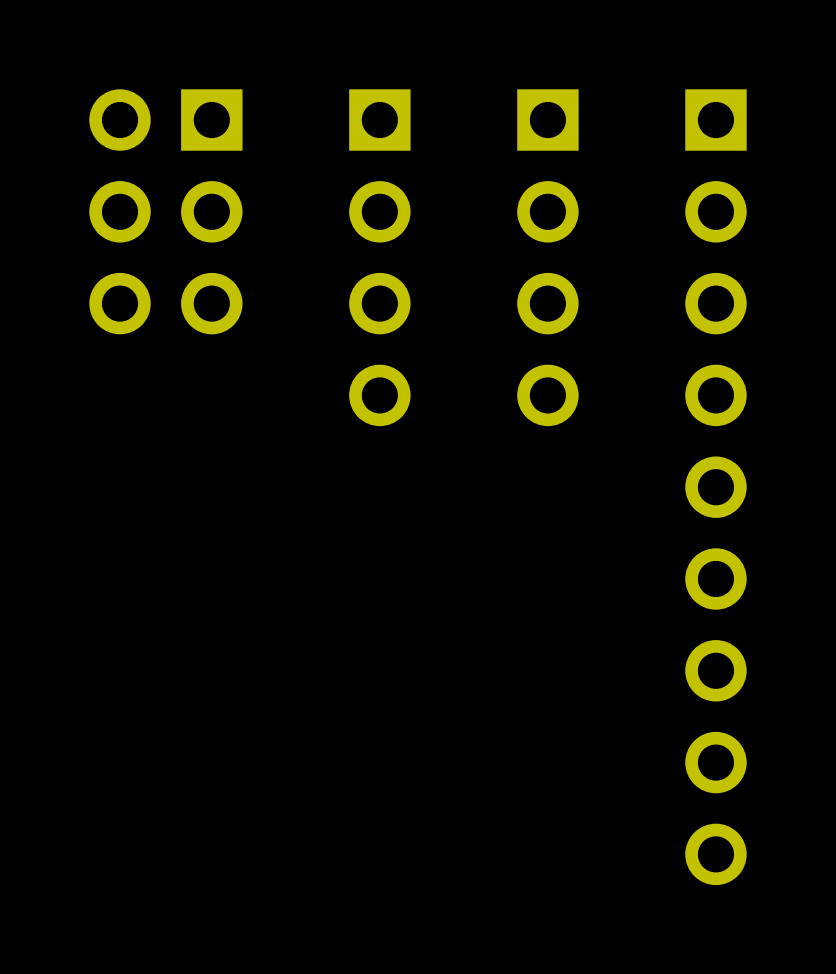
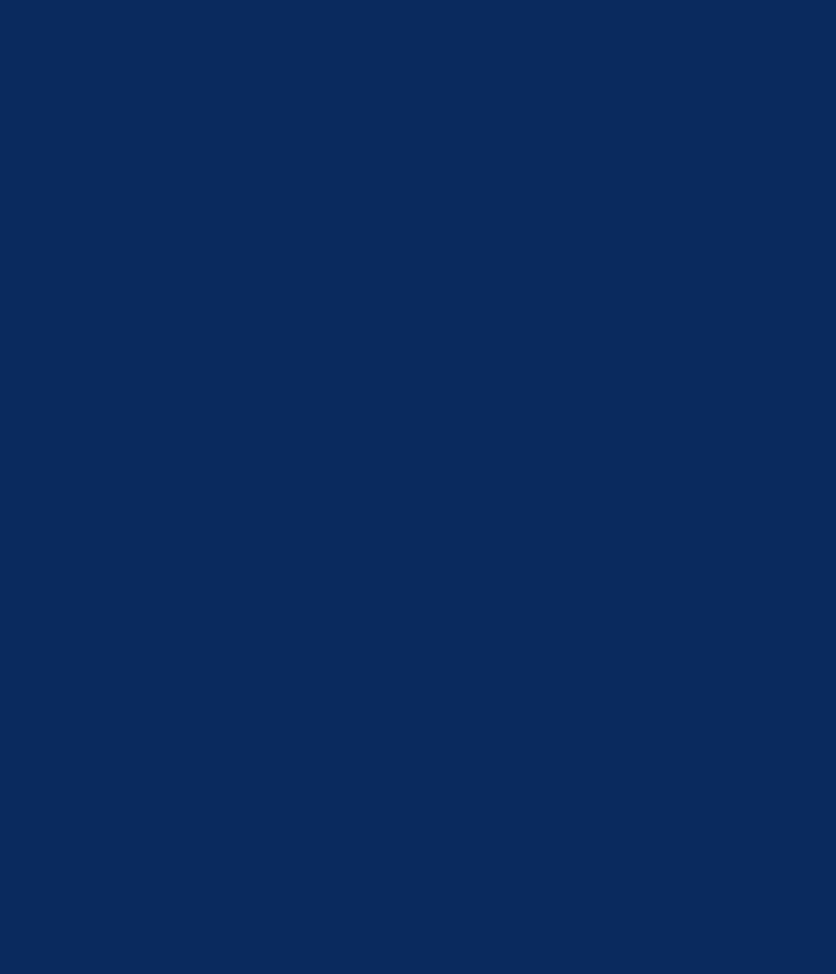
part: (165, 211) -> none
part: (379, 257) -> none
part: (547, 257) -> none
part: (715, 487) -> none

